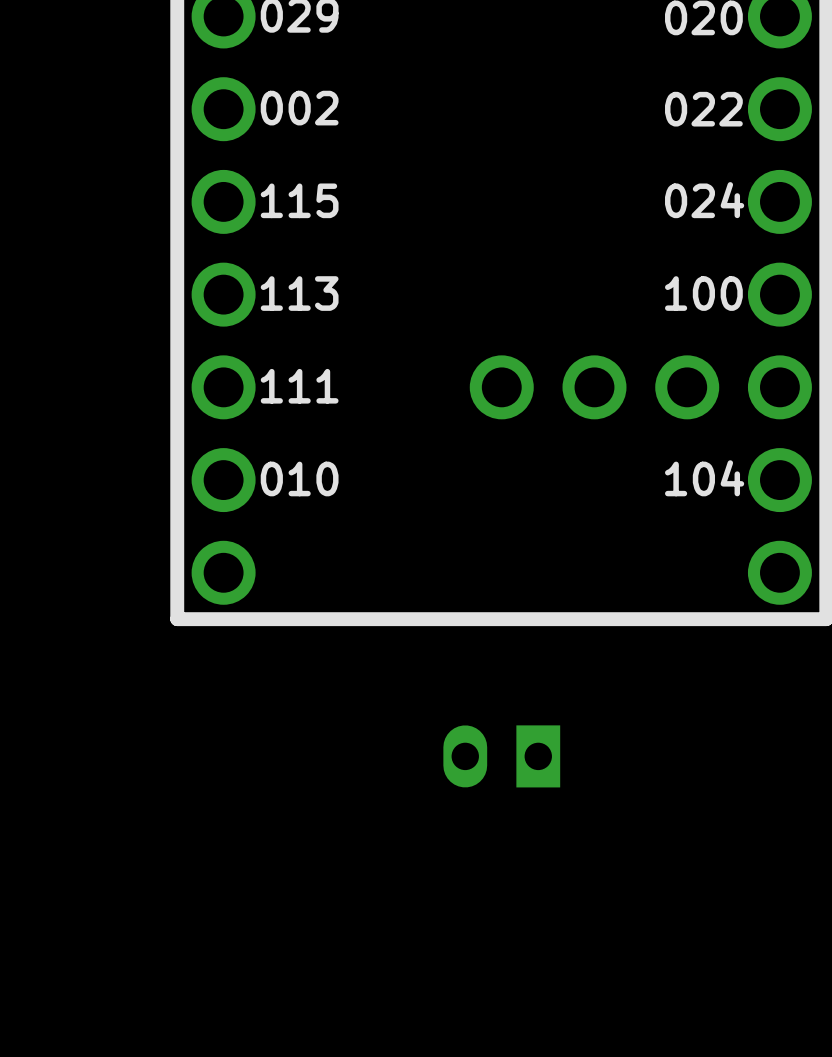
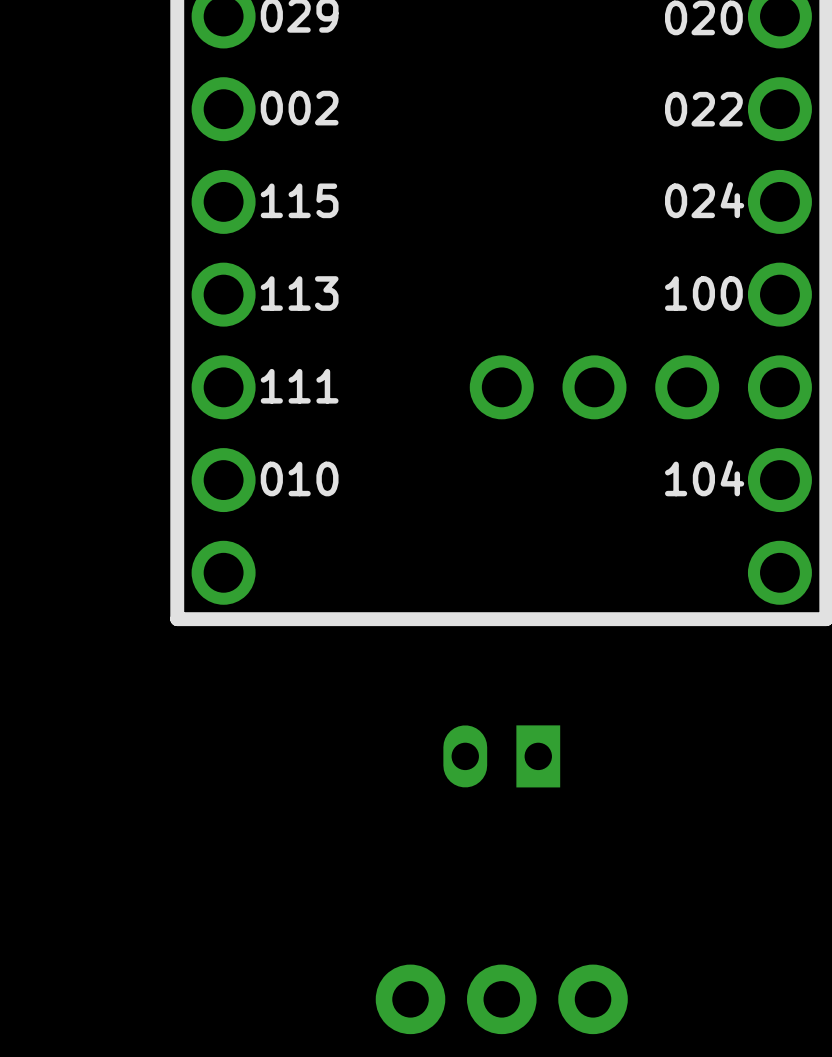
part: none -> (501, 999)

